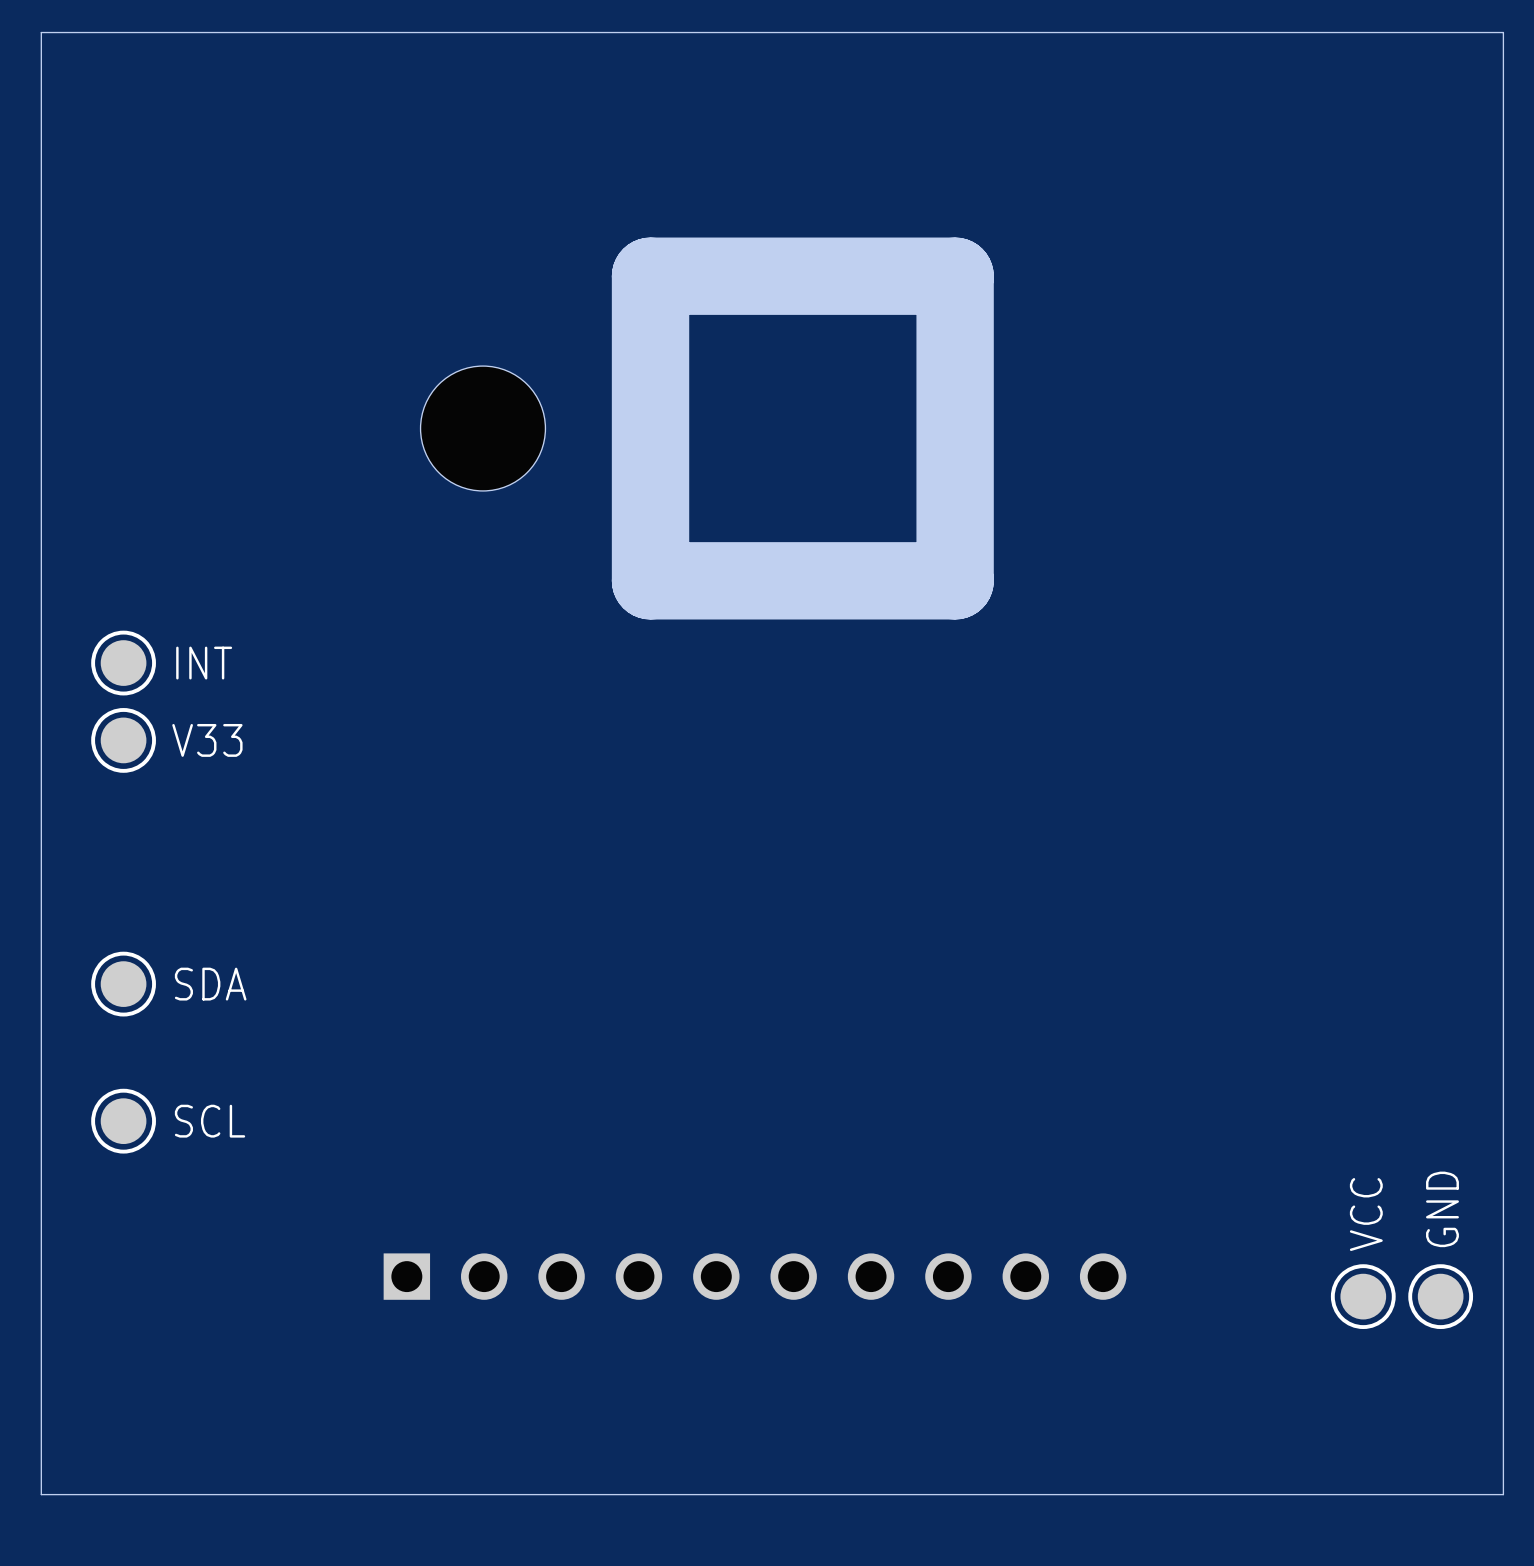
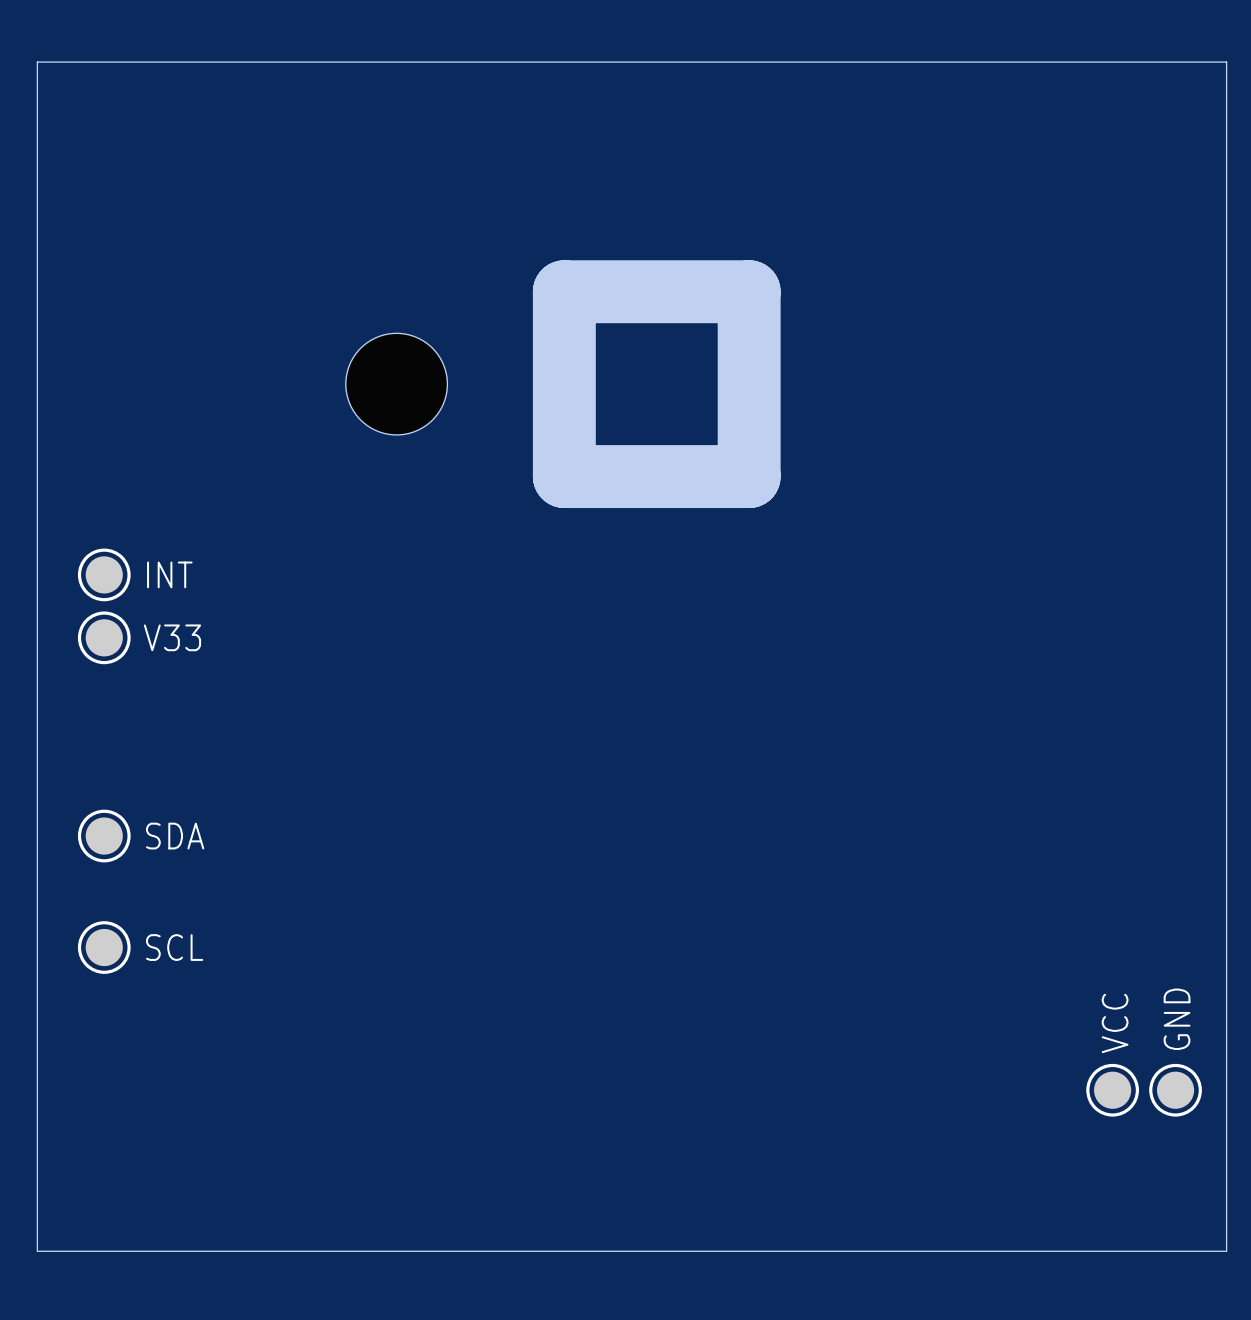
board edge: (955, 276) (650, 276) (650, 580) (955, 580) (955, 276) -> (749, 291) (749, 476) (564, 476) (564, 291) (749, 291)
part: (755, 1276) -> none

